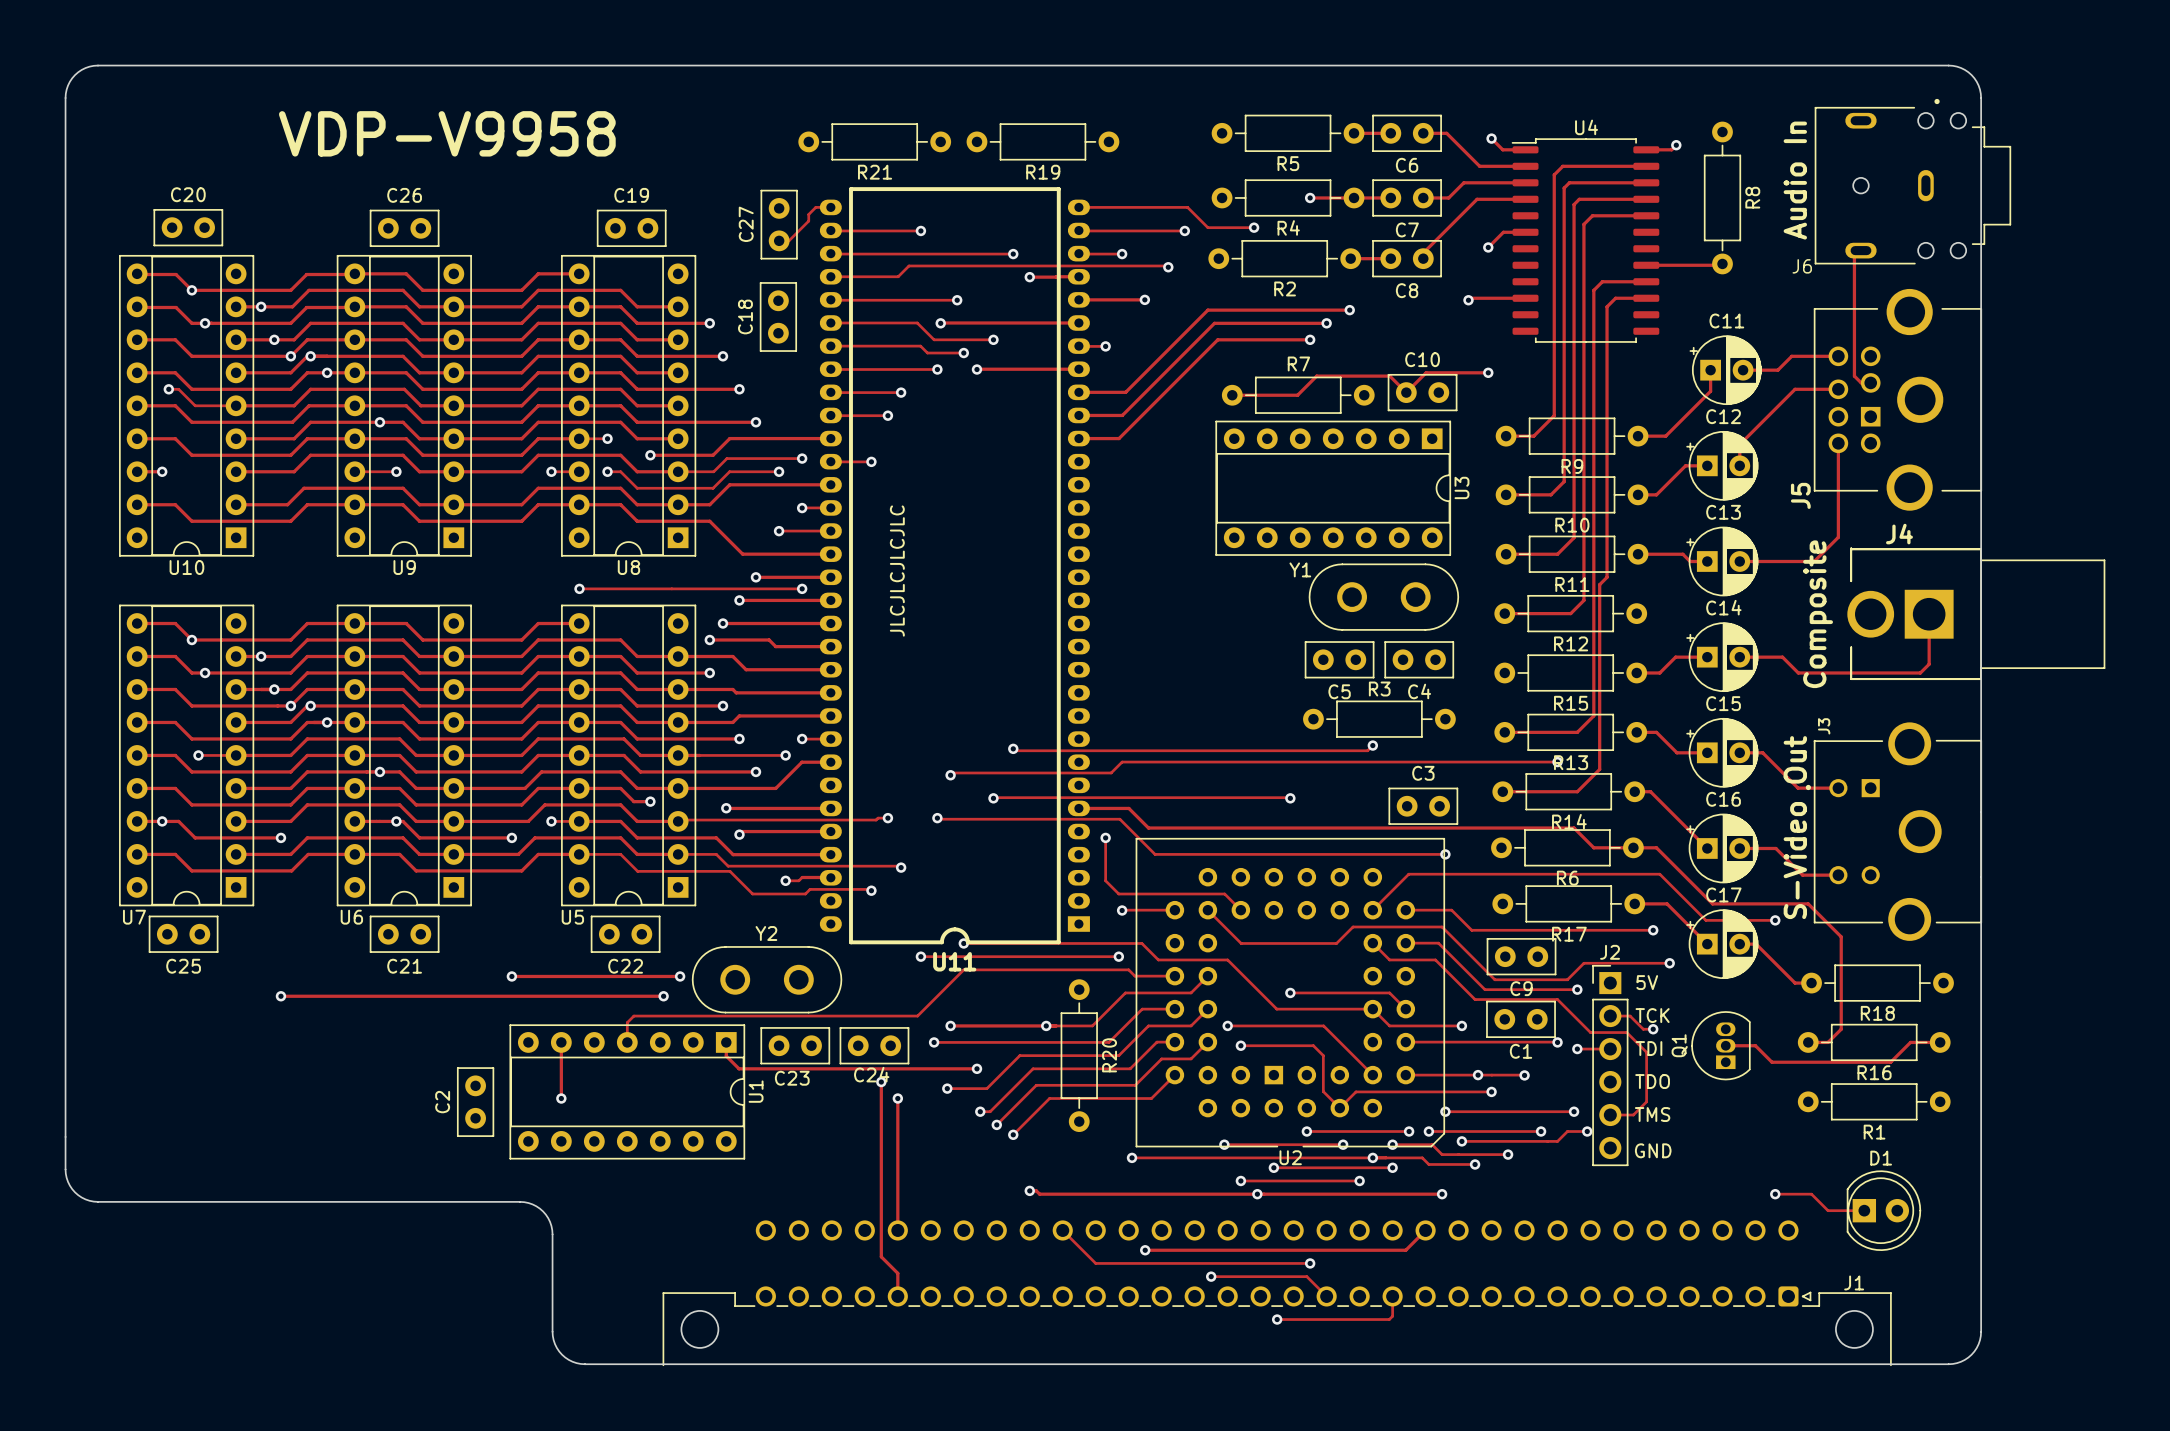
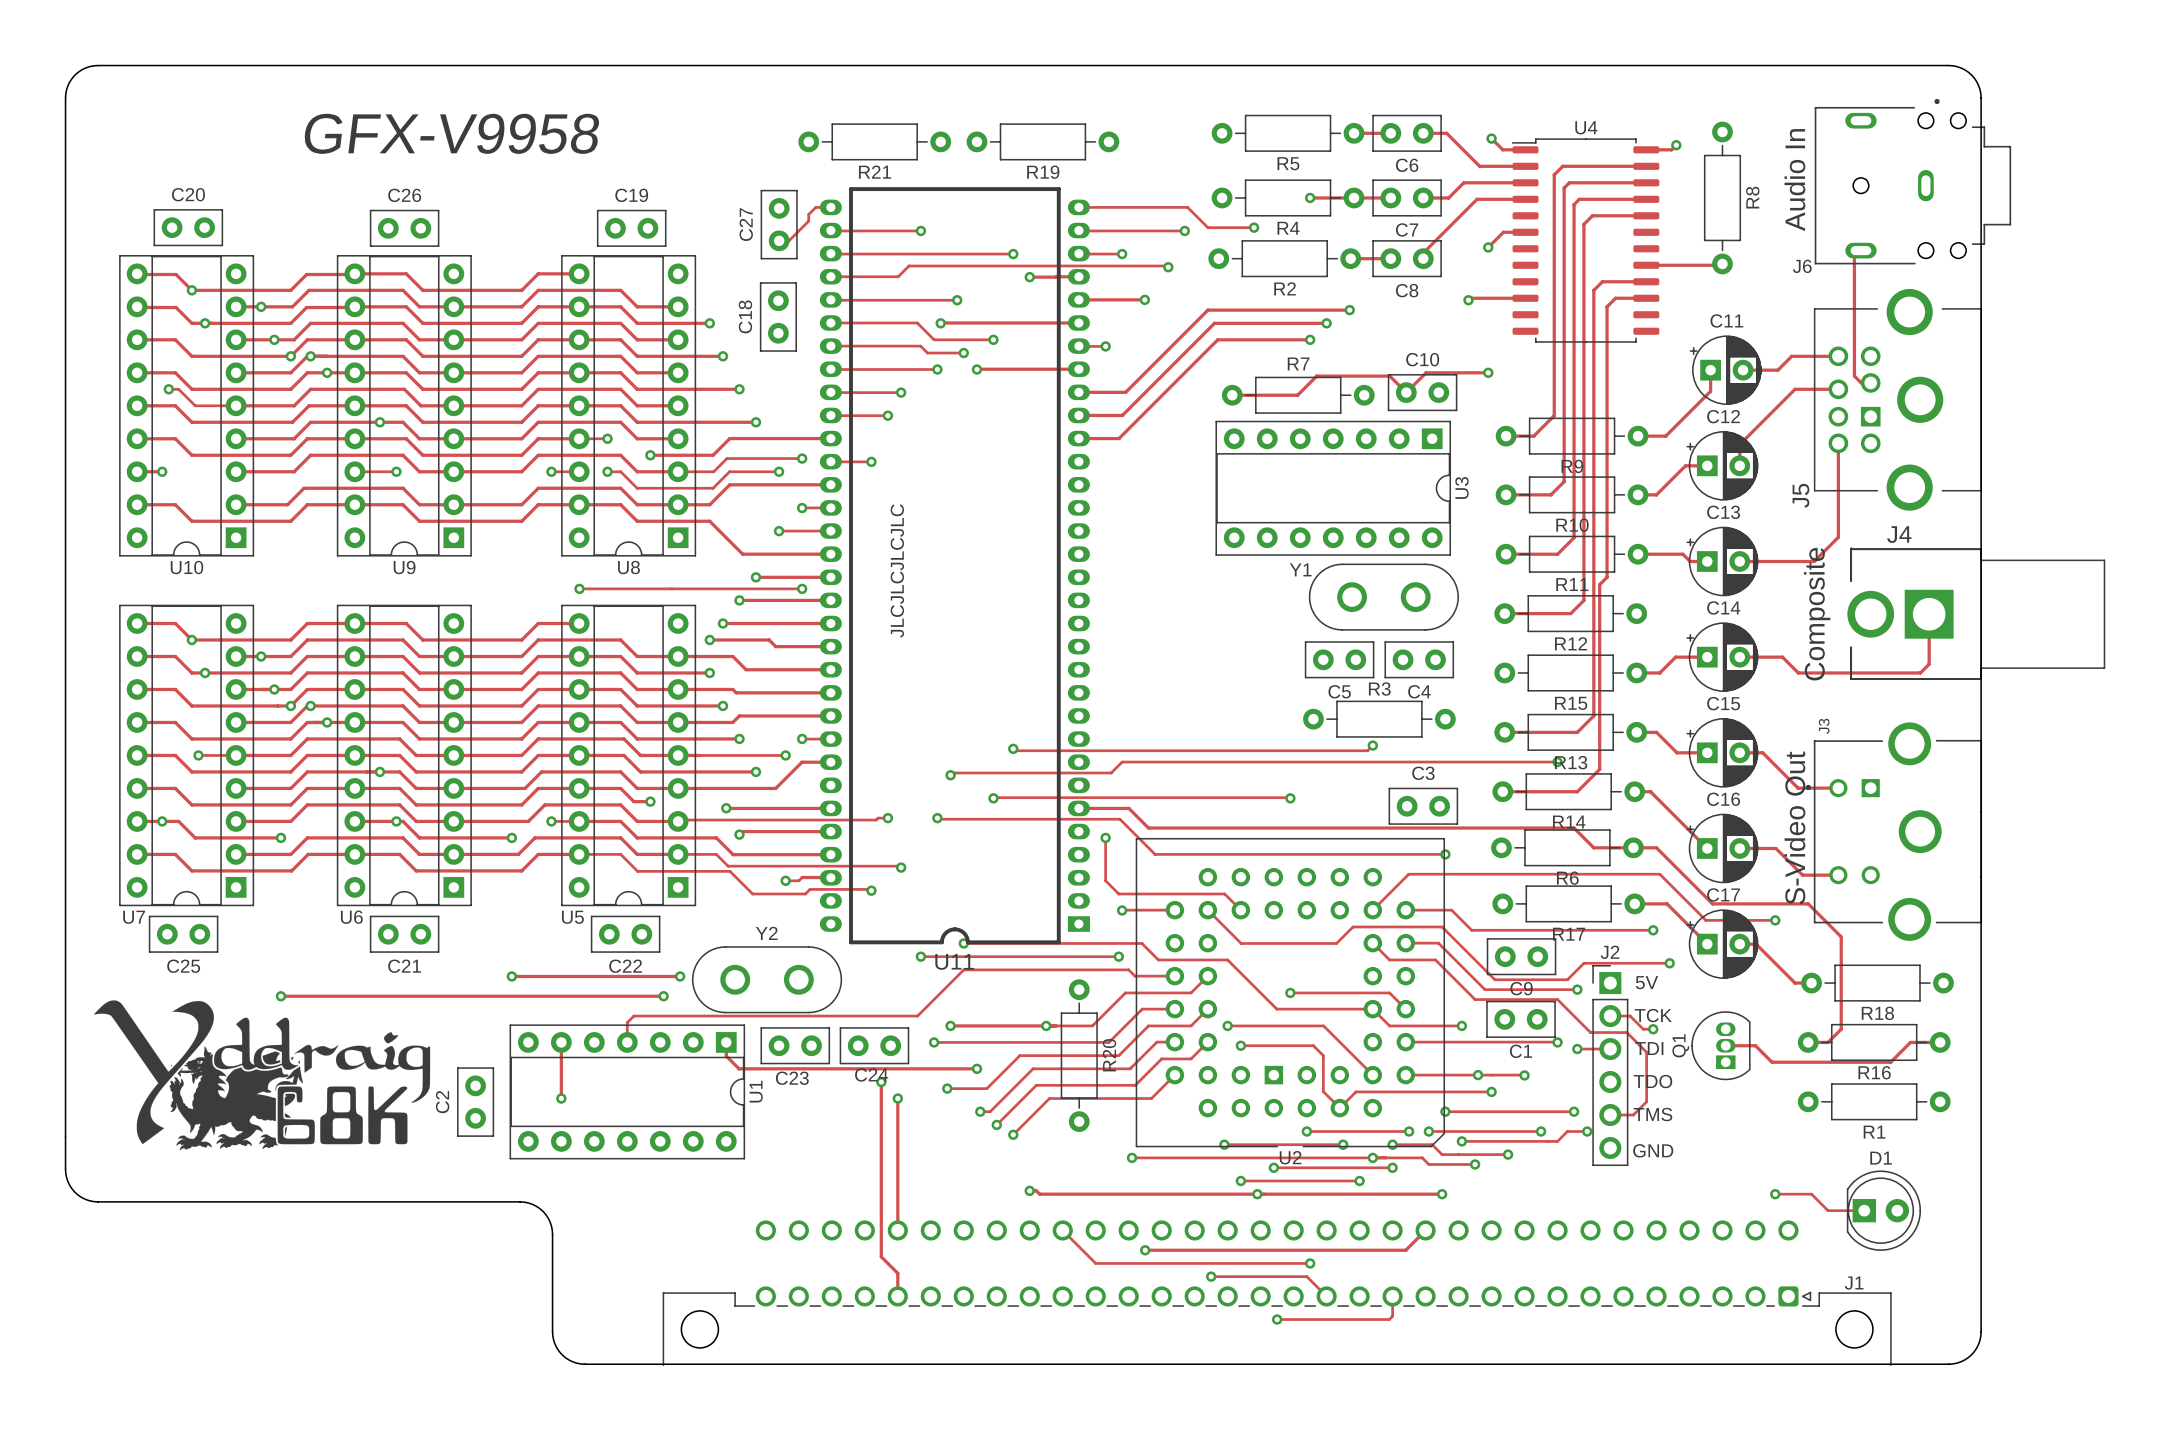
text: VDP-V9958 (447, 133) -> GFX-V9958 (451, 133)
drawing: none -> [94, 1000, 431, 1151]

